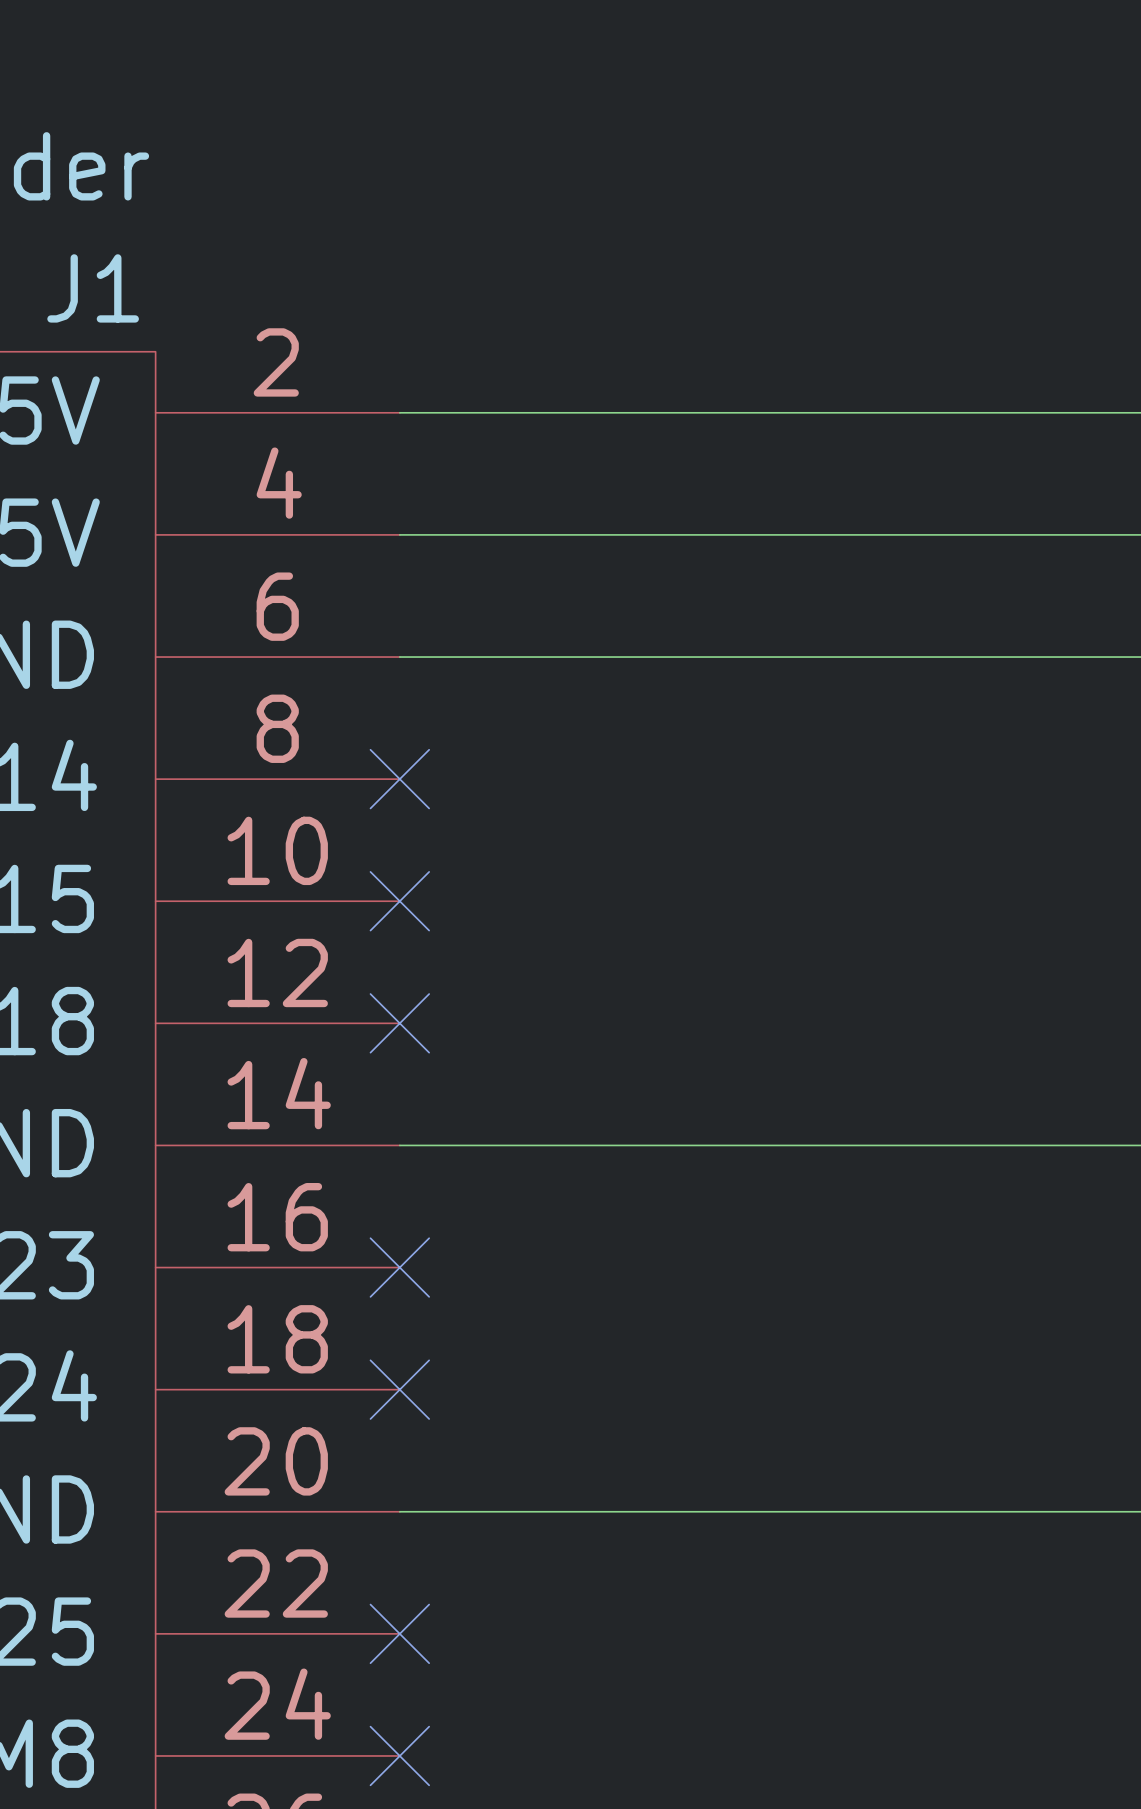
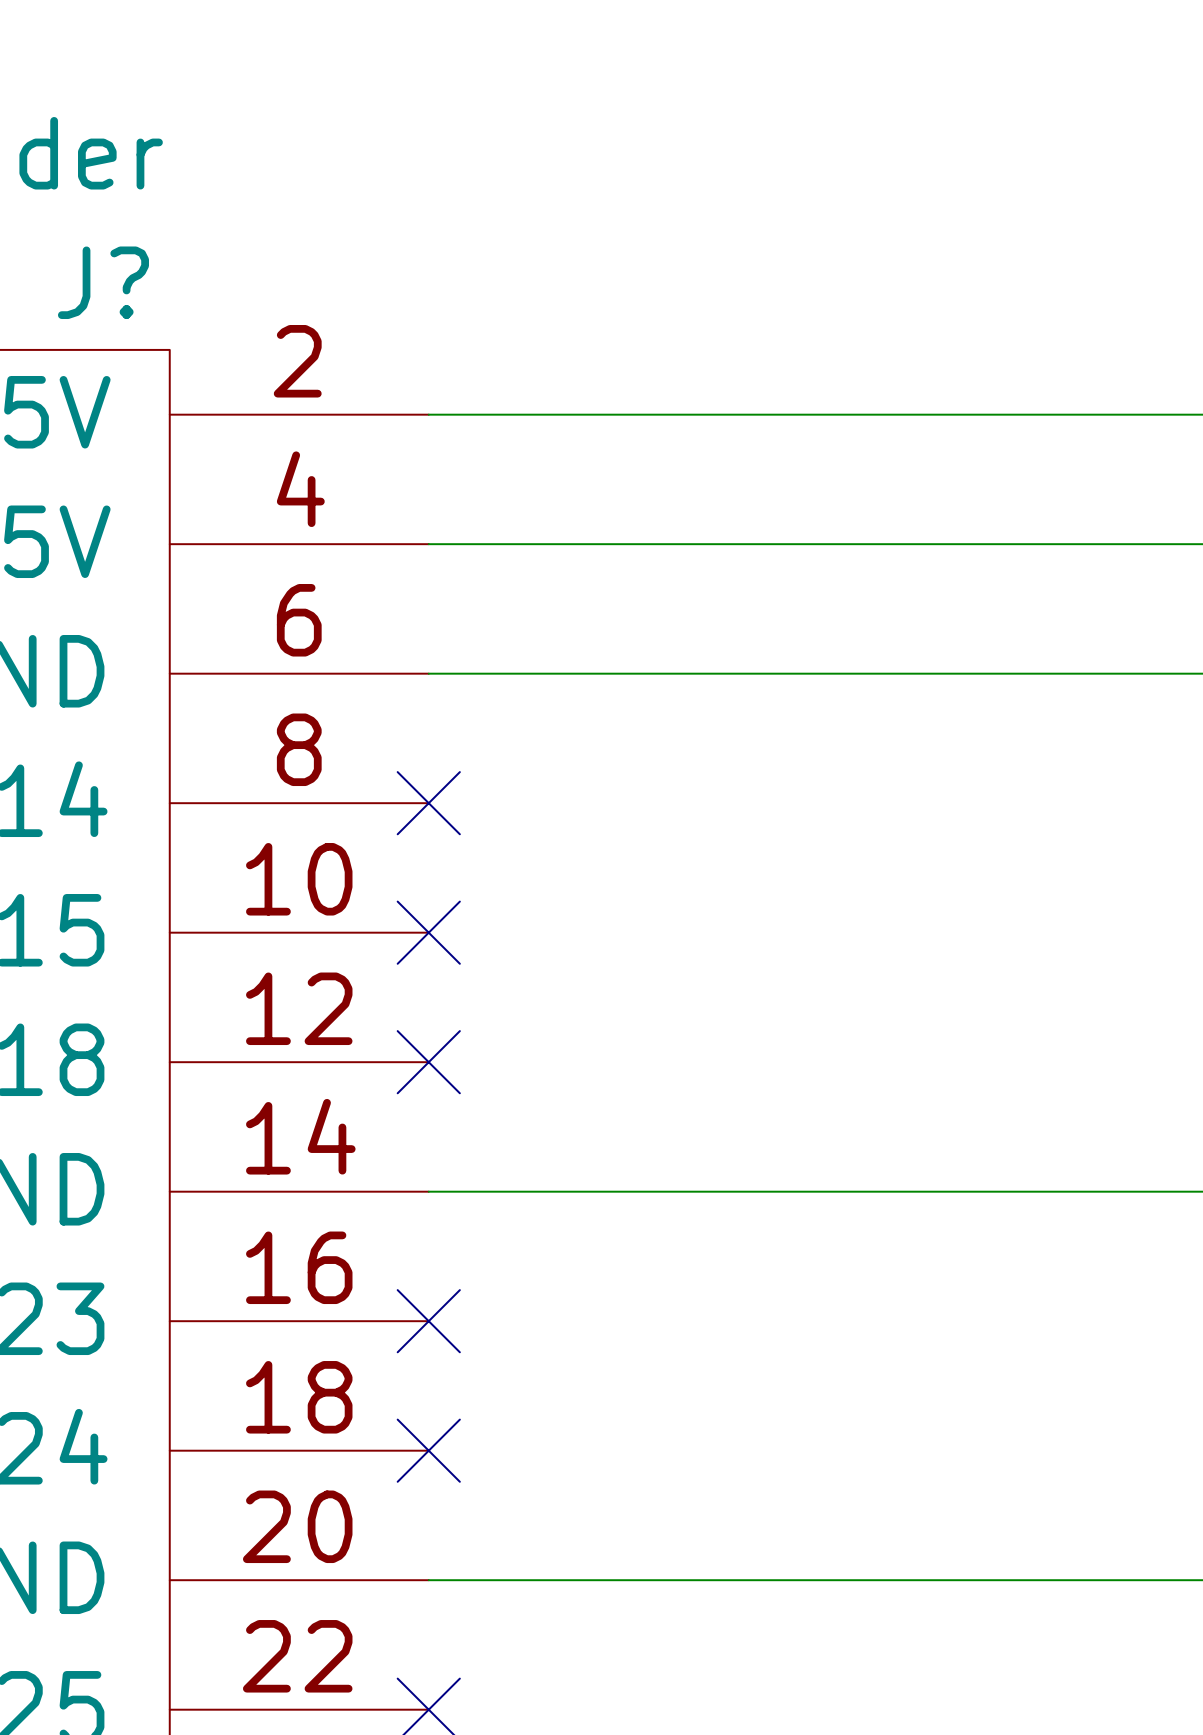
J1 name: J1 (93, 288) -> J? (103, 282)

